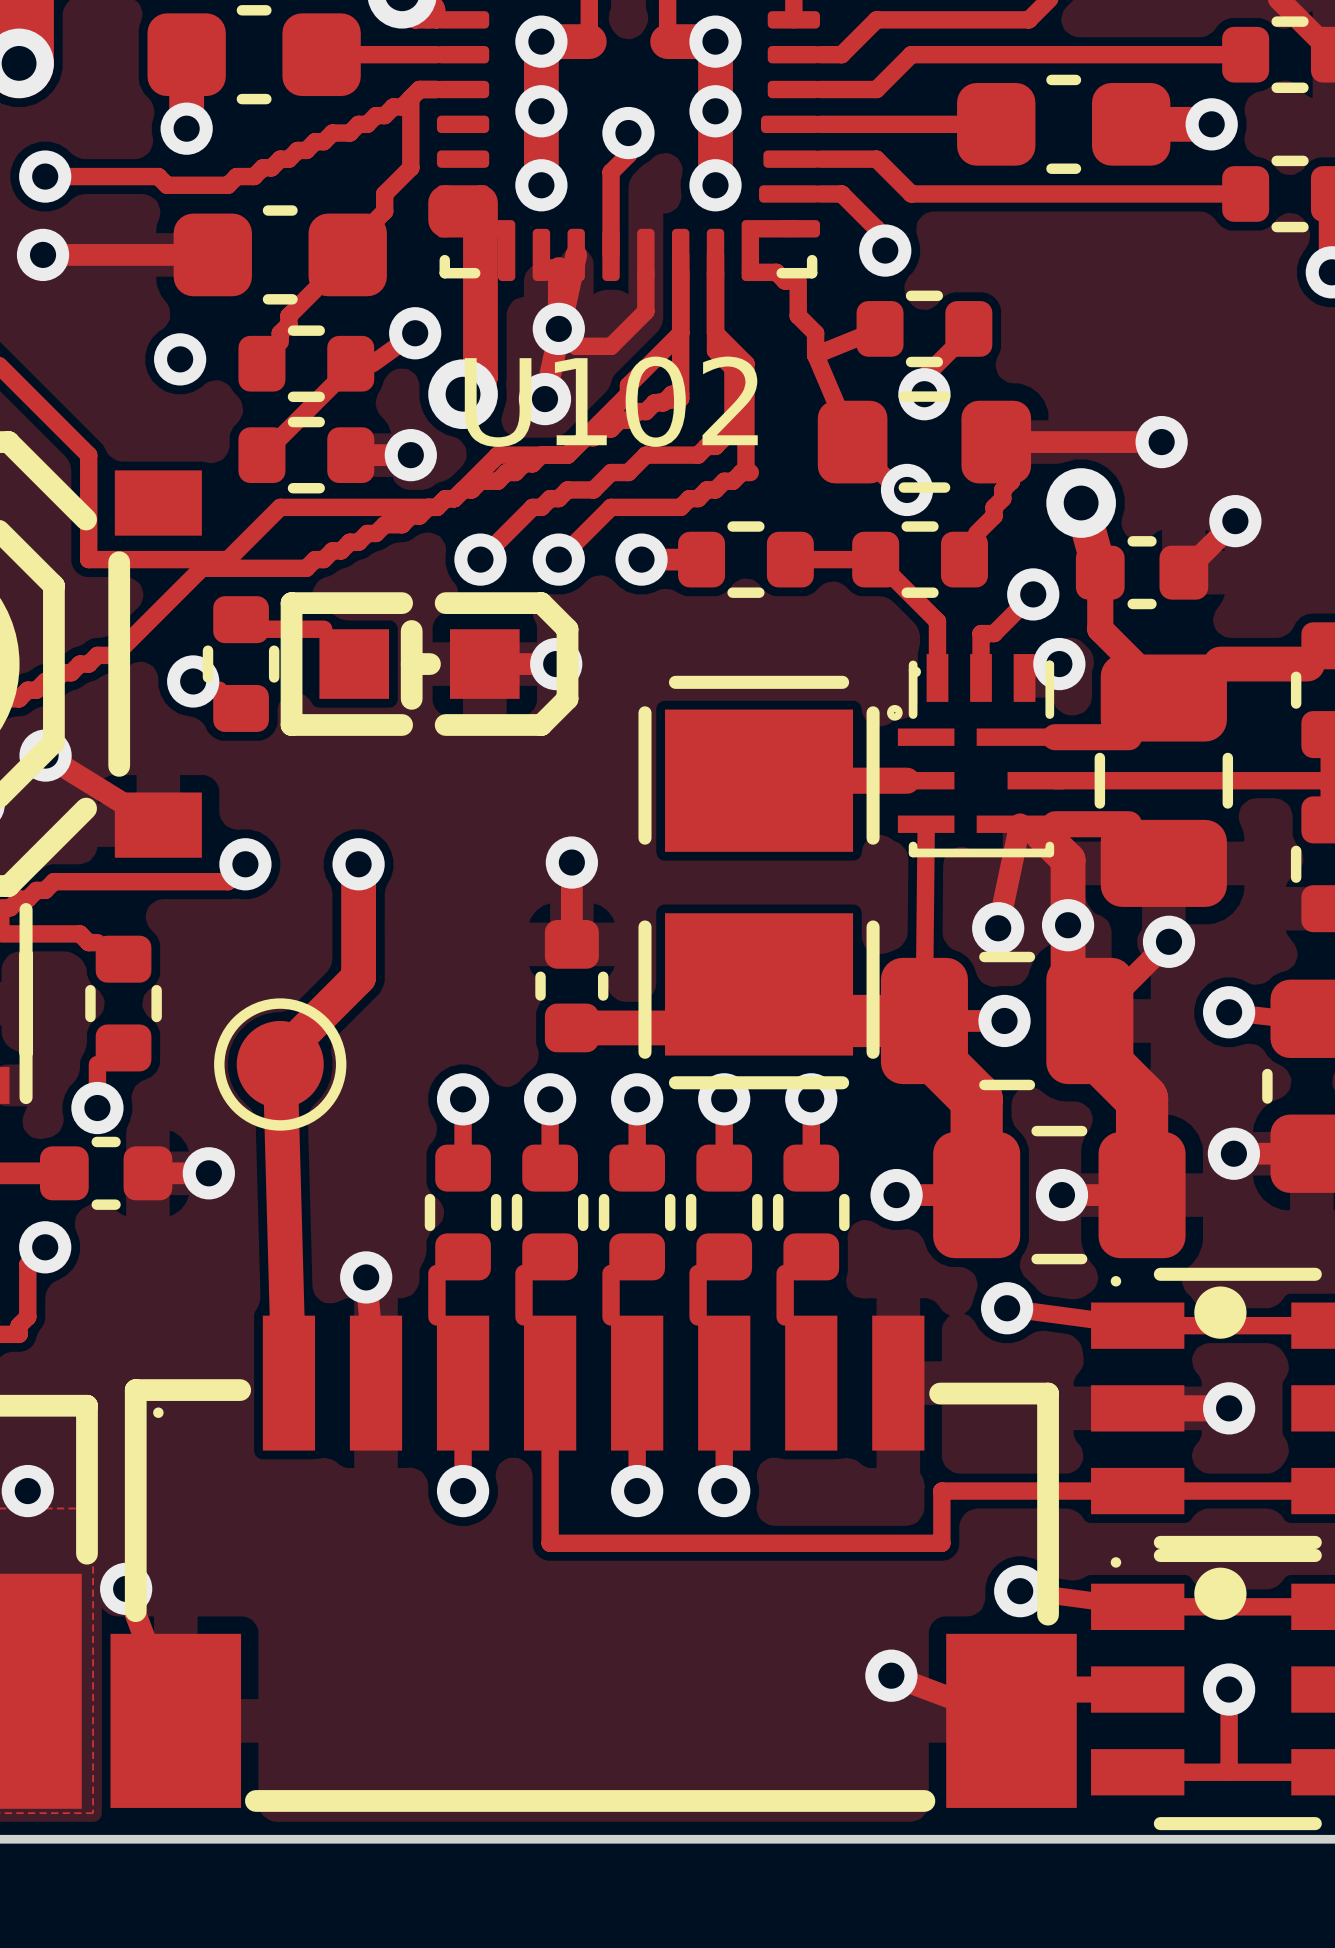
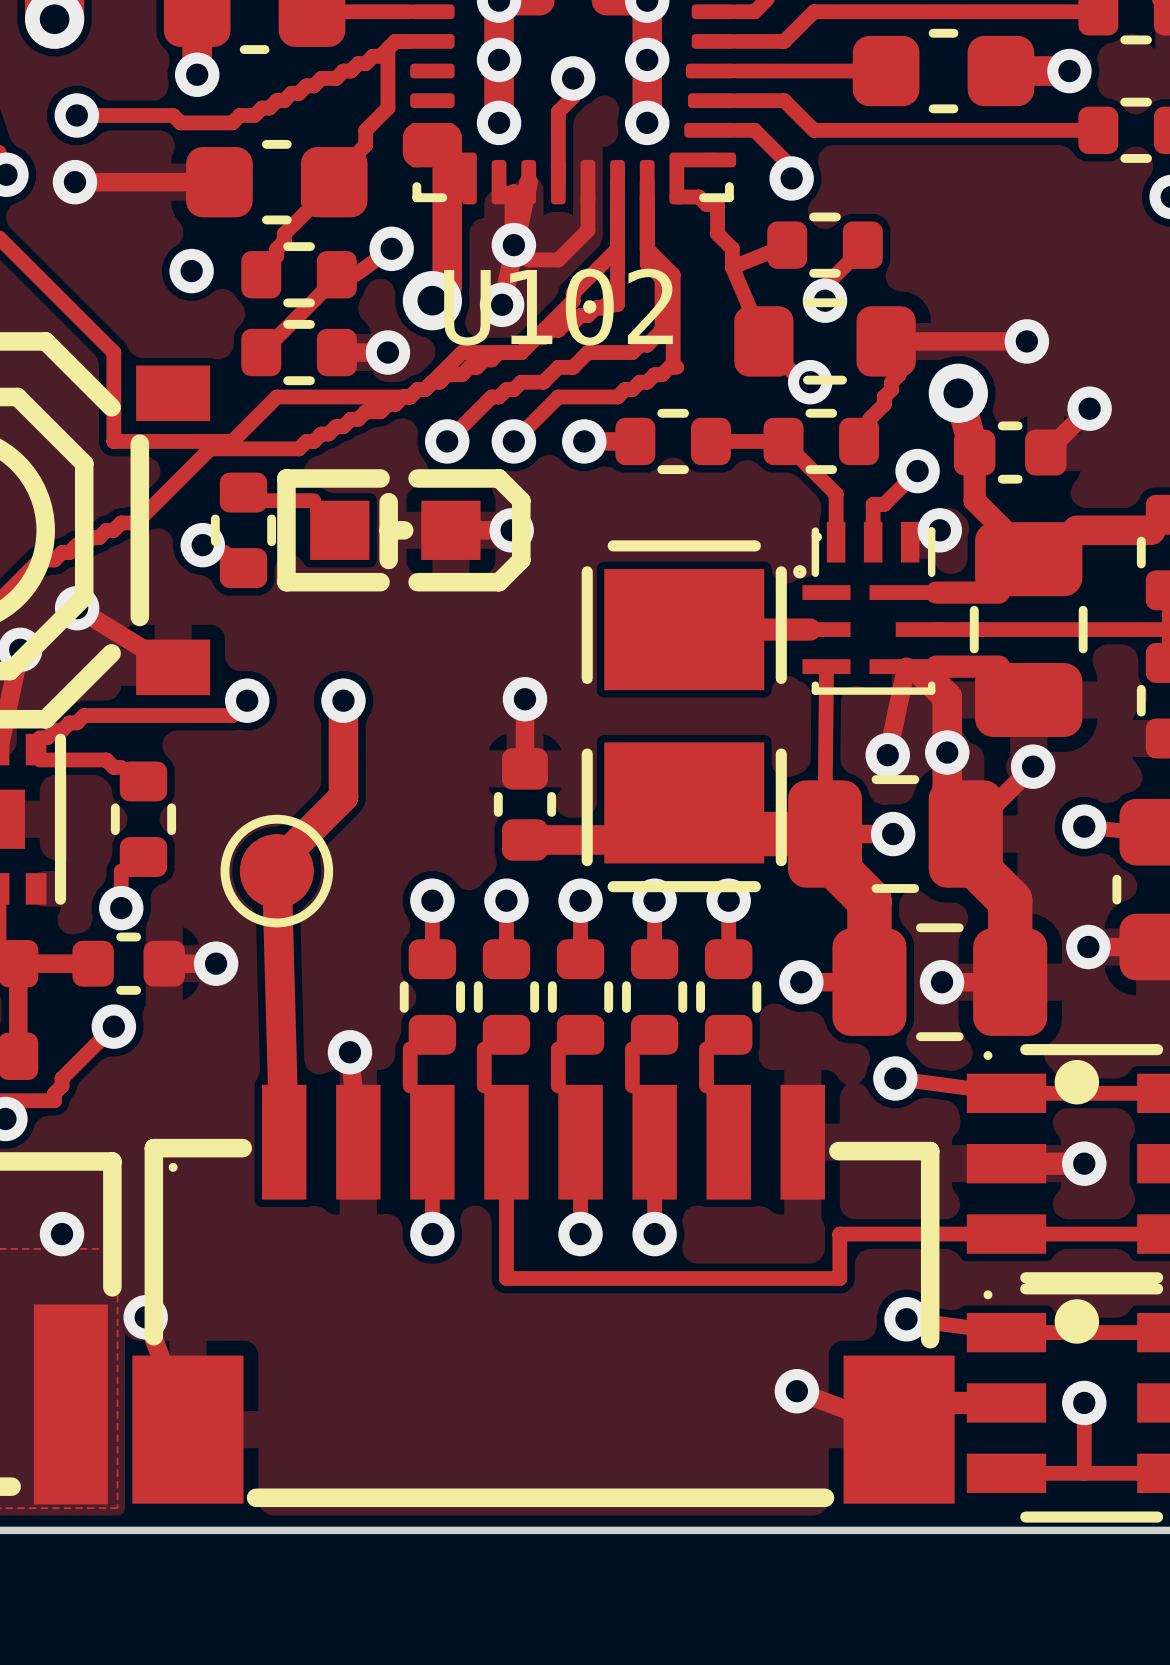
track: (45, 1247) (27, 1264) (27, 1308) -> (113, 1026) (62, 1078)
via position: (45, 1247) -> (113, 1026)

